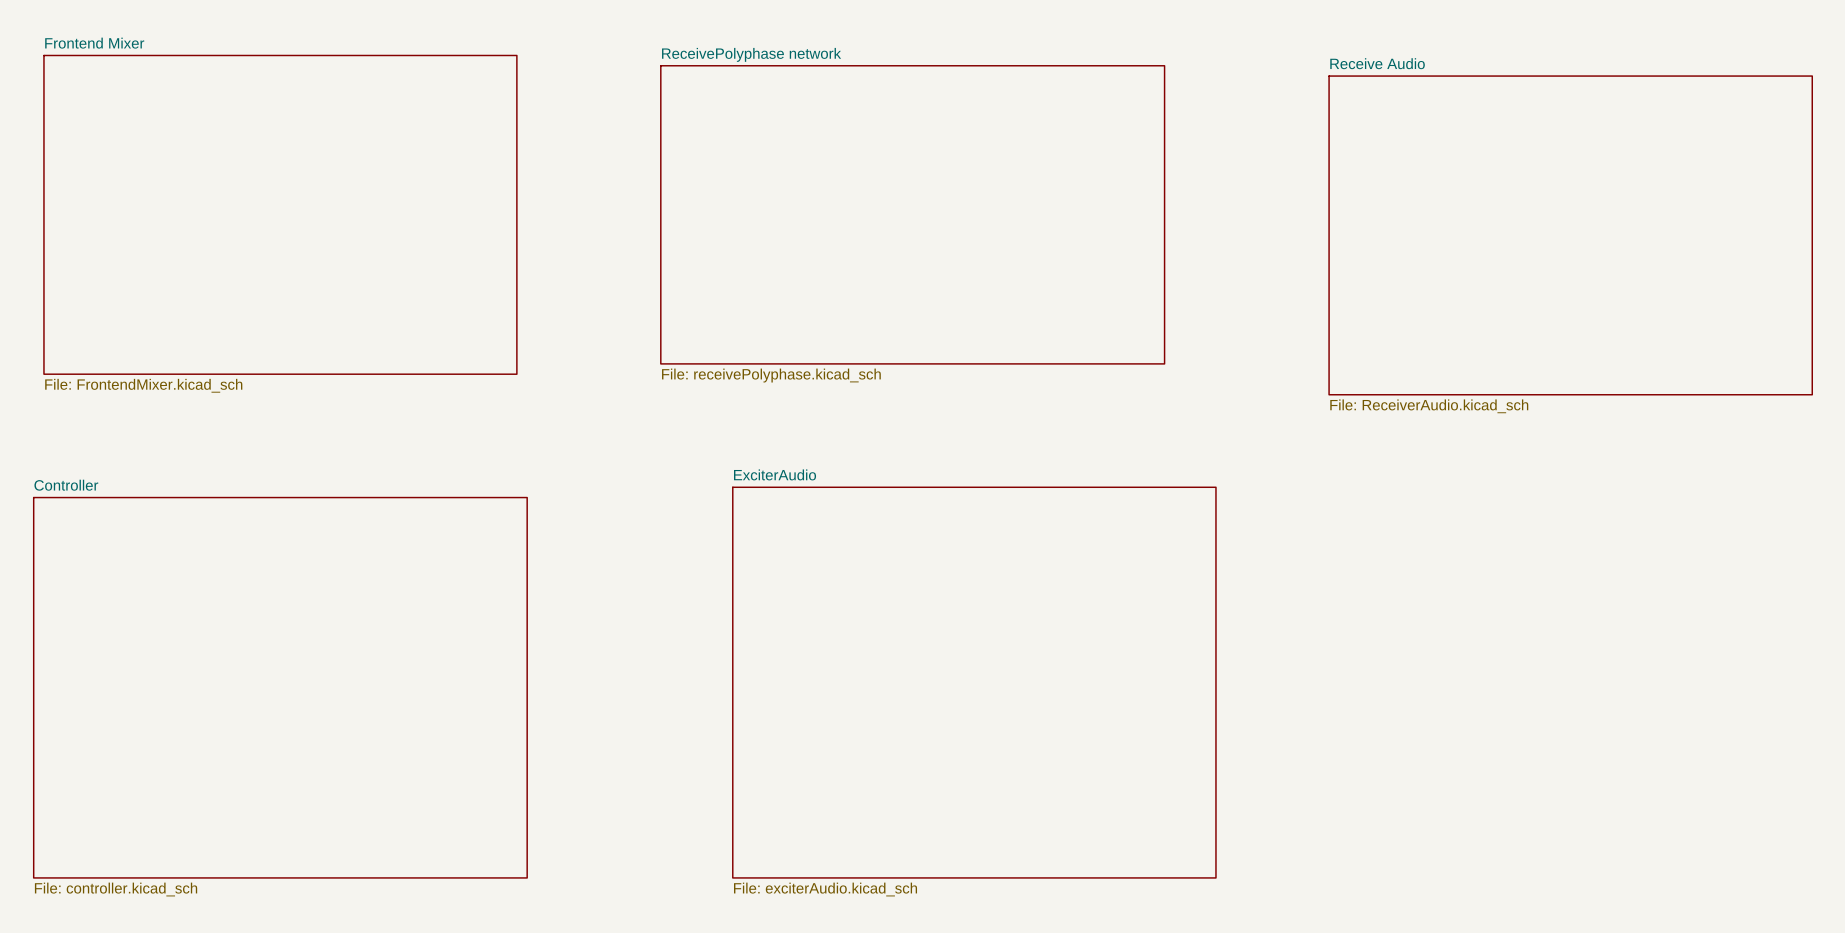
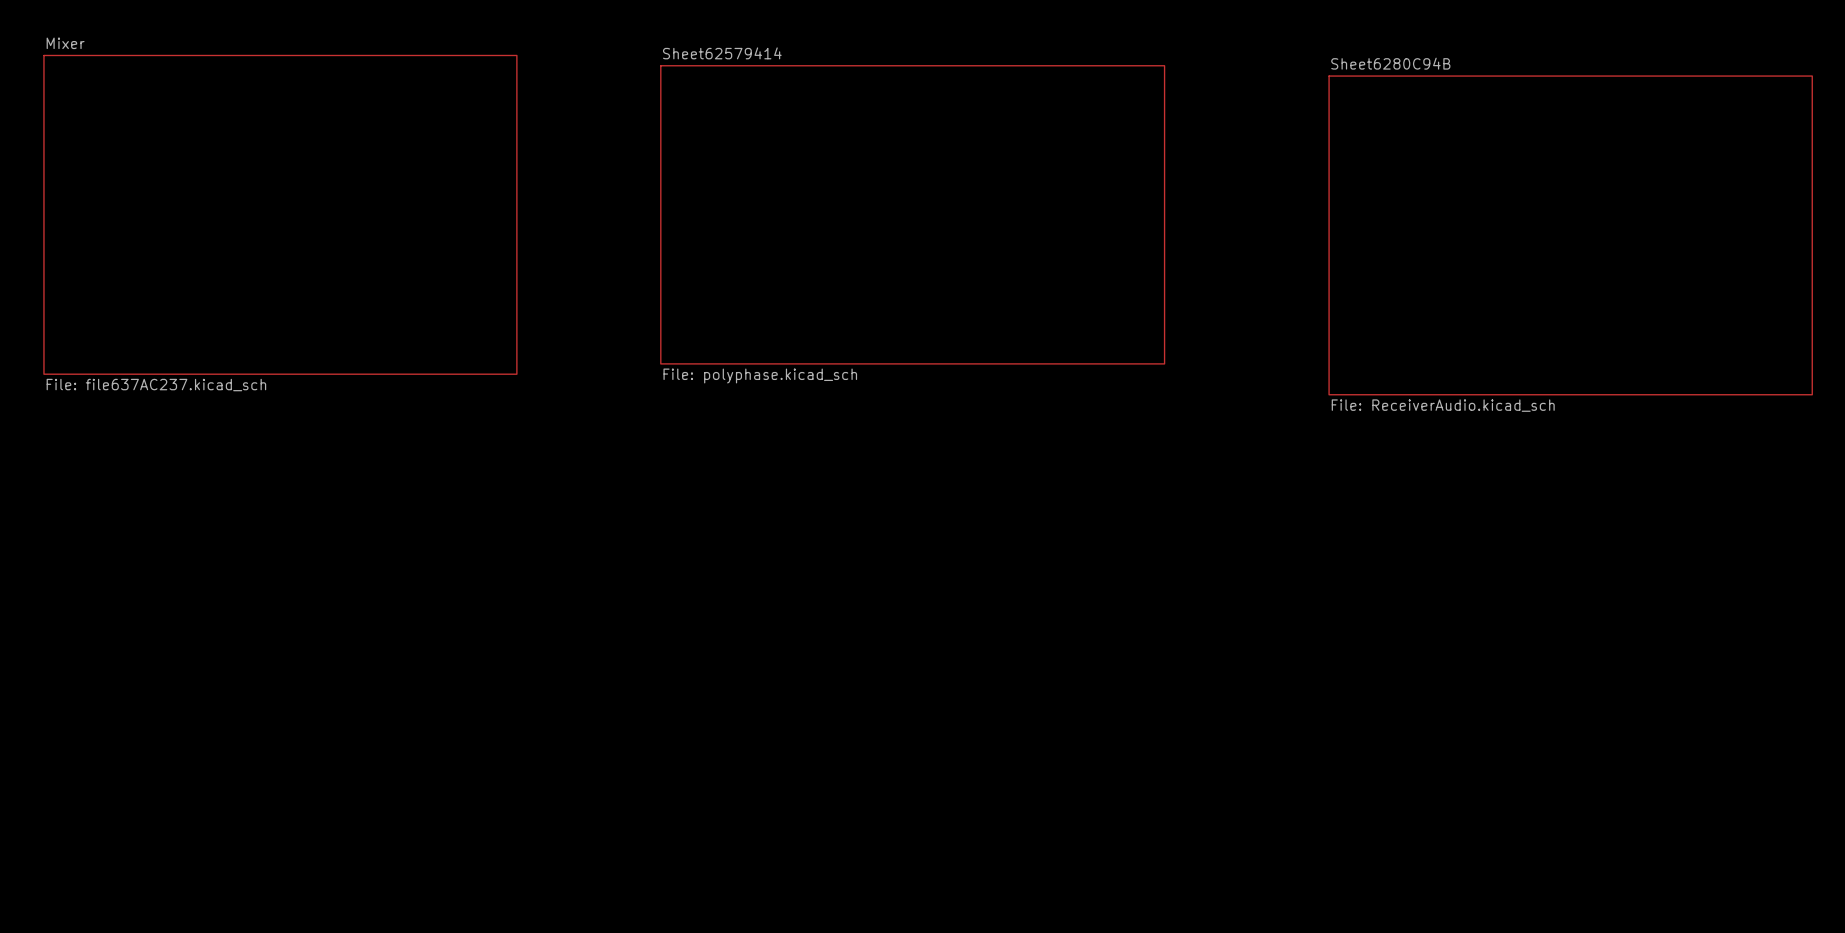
sheet Frontend Mixer name: Frontend Mixer (94, 43) -> Mixer (65, 43)
sheet ReceivePolyphase network name: ReceivePolyphase network (751, 54) -> Sheet62579414 (722, 53)
sheet Receive Audio name: Receive Audio (1377, 63) -> Sheet6280C94B (1390, 63)
sheet ReceivePolyphase network value: File: receivePolyphase.kicad_sch (771, 375) -> File: polyphase.kicad_sch (760, 375)
sheet Frontend Mixer value: File: FrontendMixer.kicad_sch (143, 385) -> File: file637AC237.kicad_sch (156, 385)
sheet ExciterAudio: File: exciterAudio.kicad_sch (974, 682) -> none
sheet Controller: File: controller.kicad_sch (280, 687) -> none

